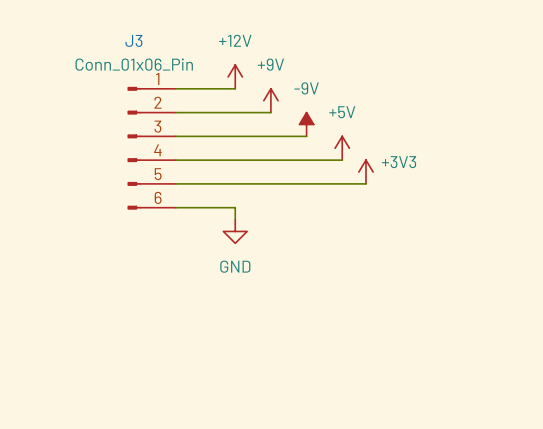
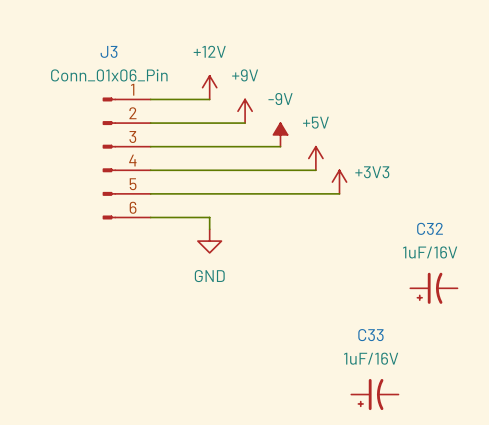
C32: none -> 1uF/16V (433, 288)
C33: none -> 1uF/16V (374, 394)

